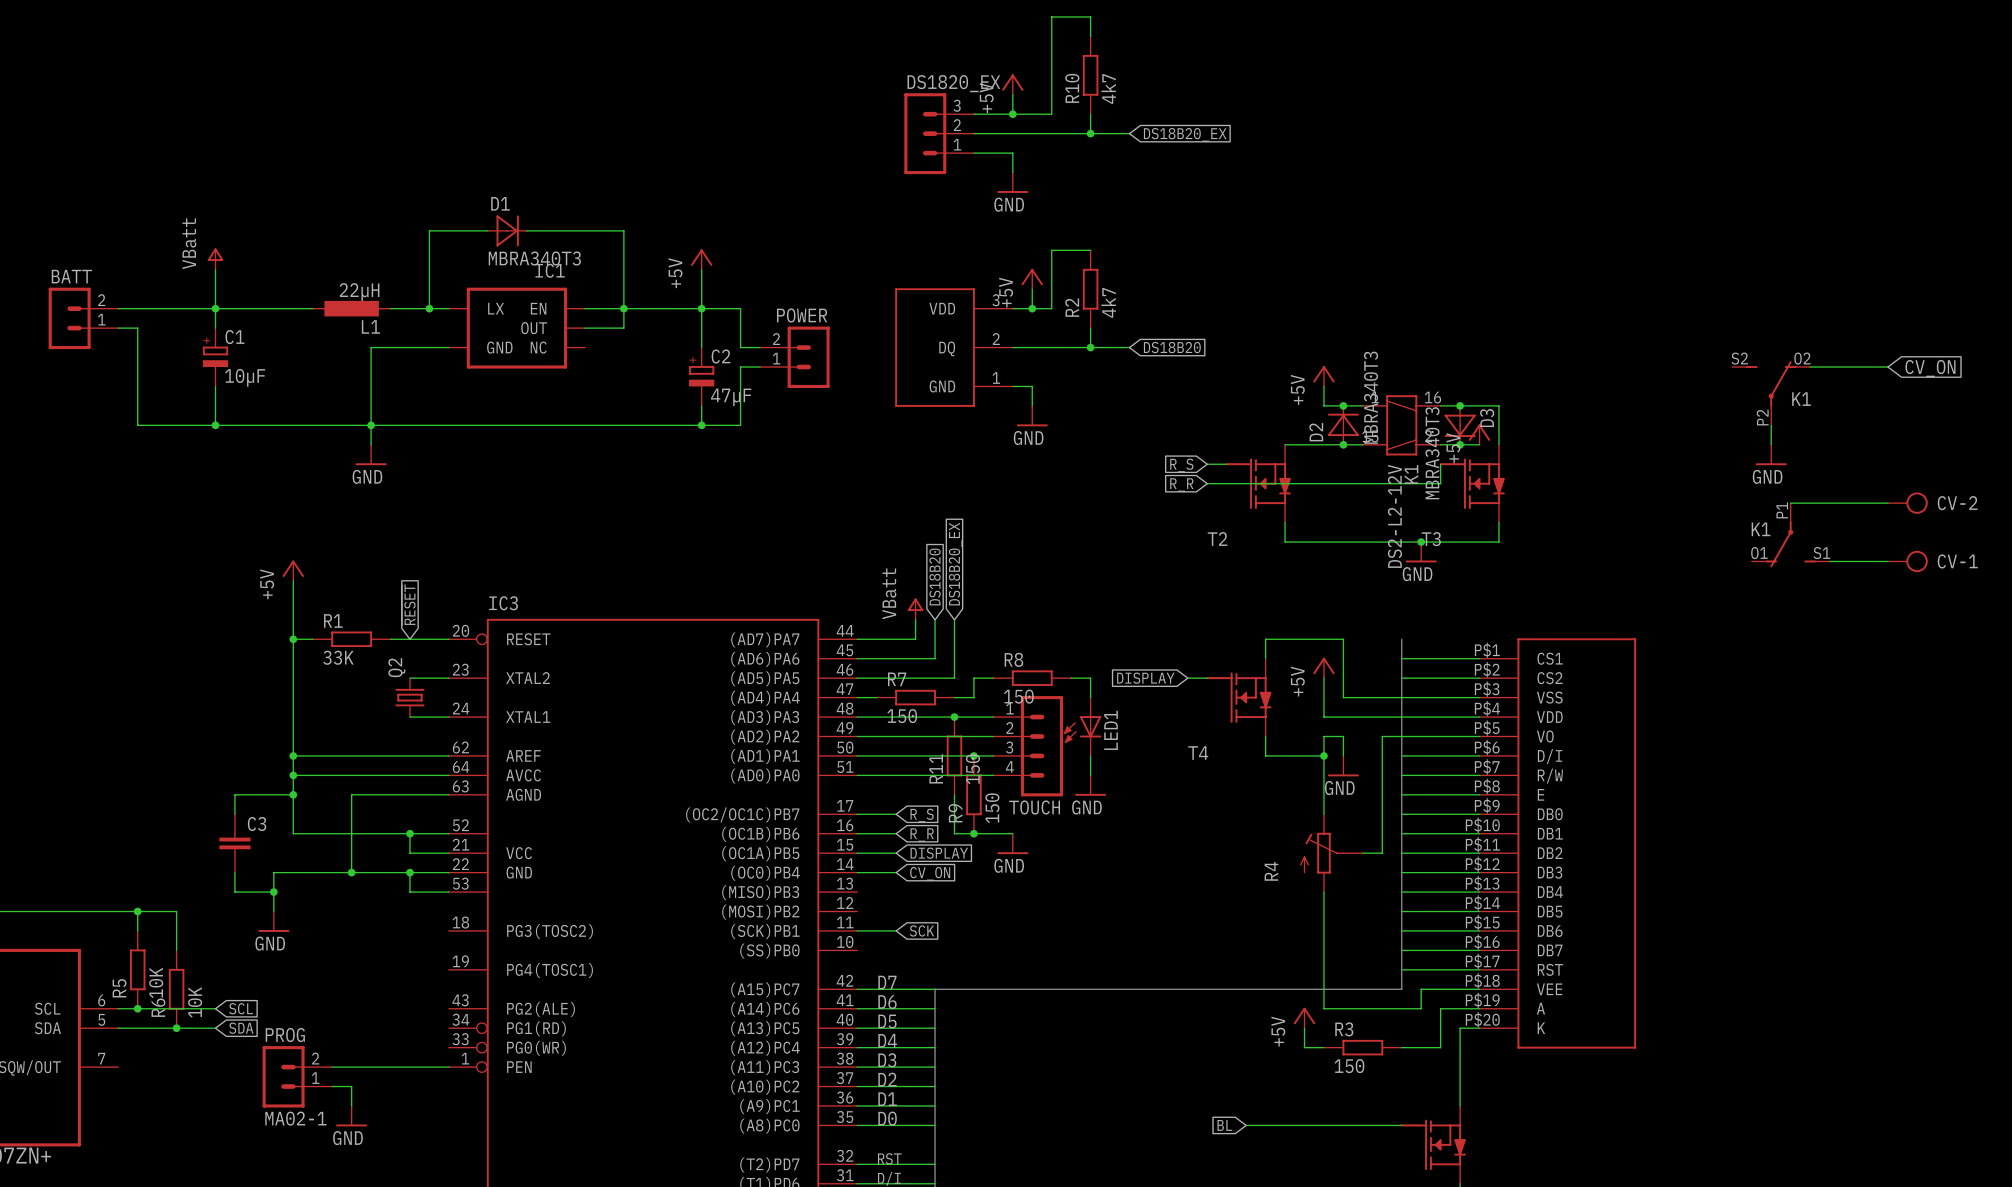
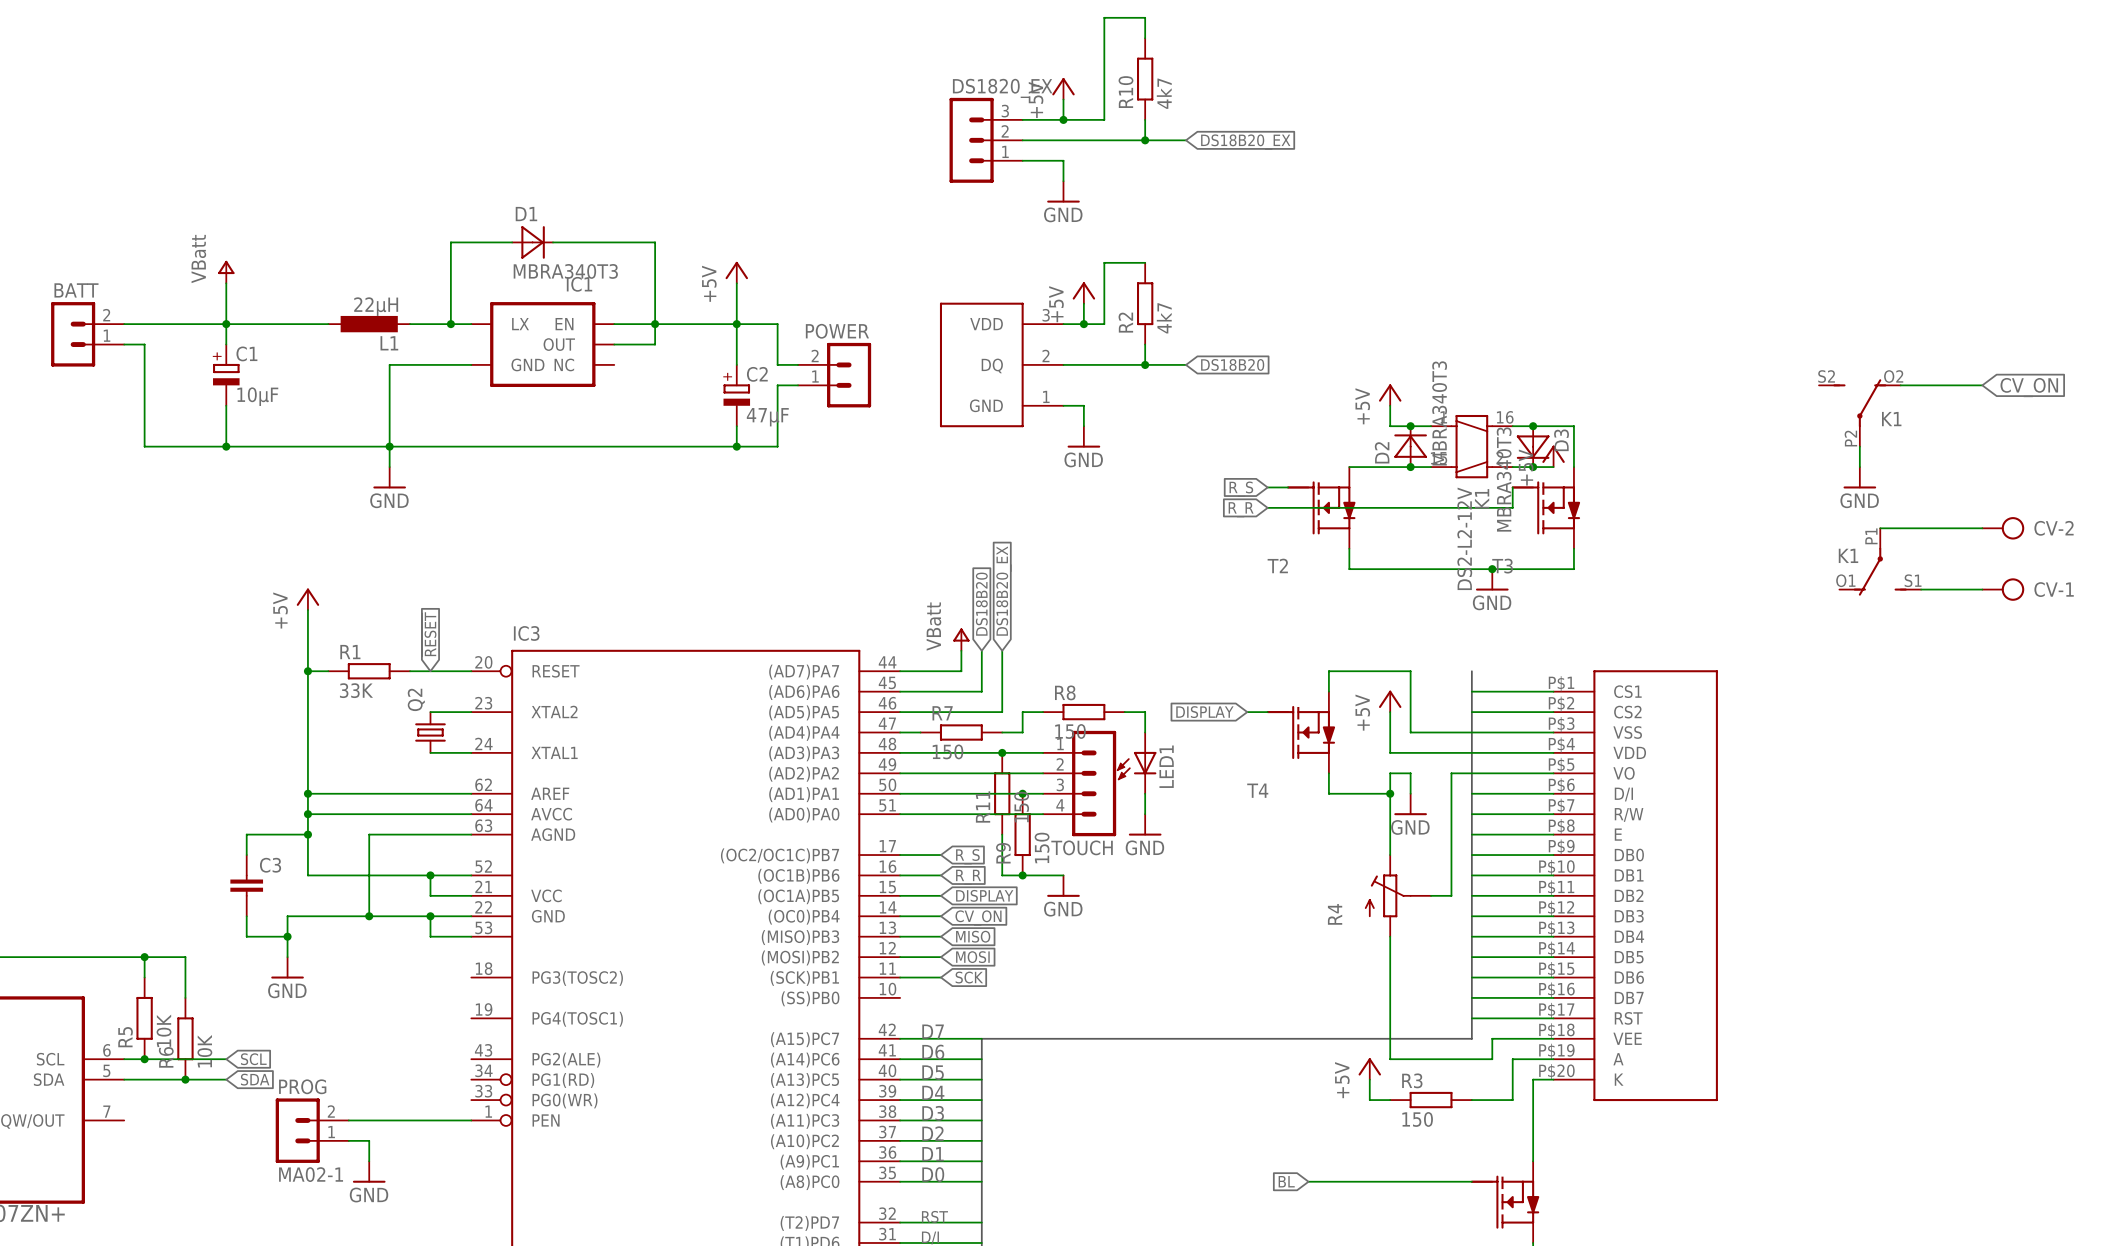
wire: none -> (900, 936) (940, 936)
global label: none -> MISO (973, 936)
wire: none -> (900, 957) (940, 957)
global label: none -> MOSI (972, 957)

